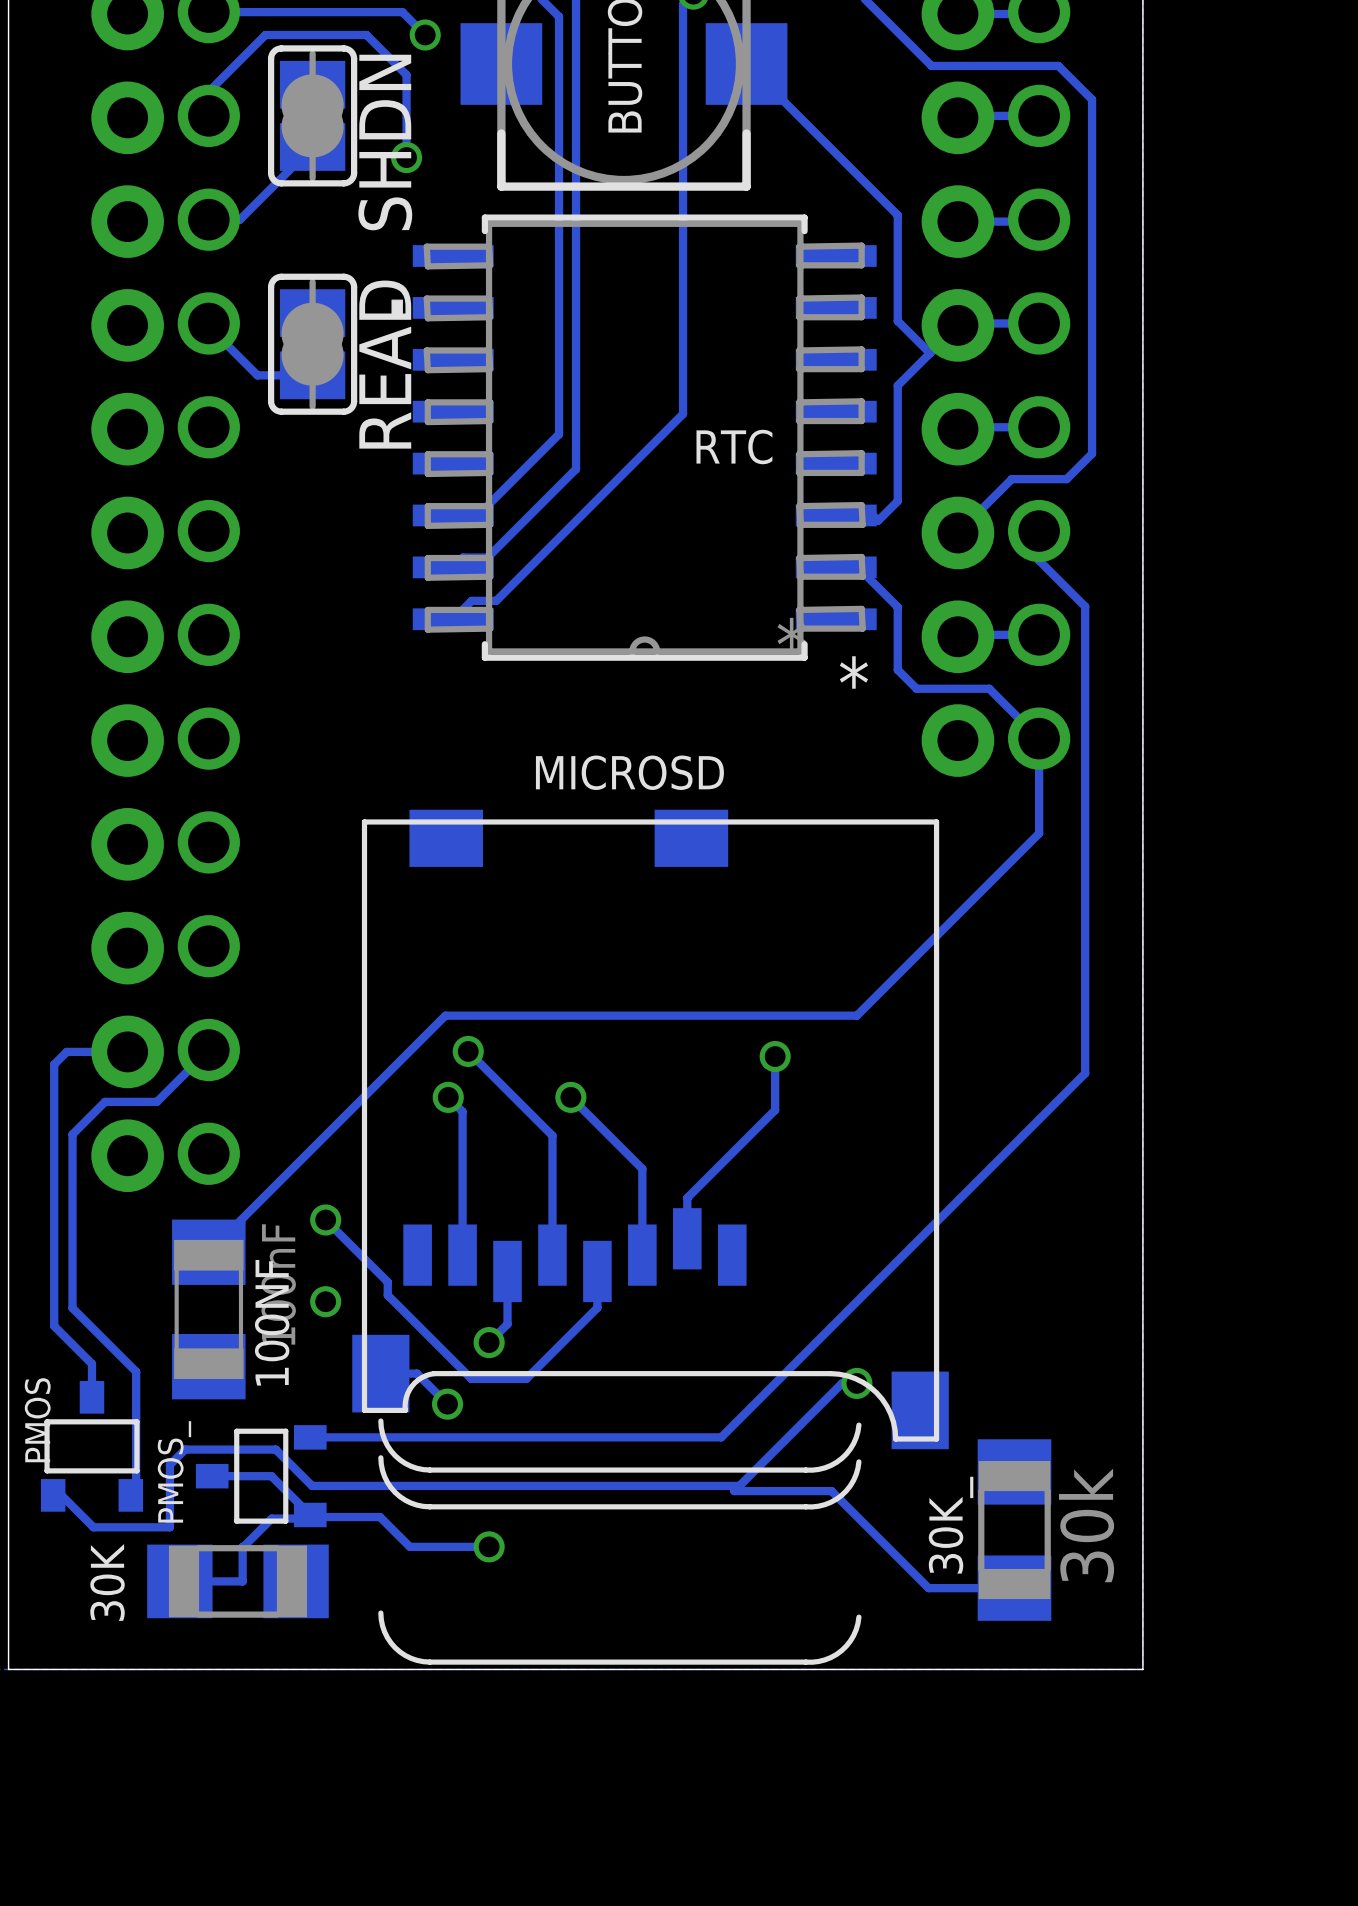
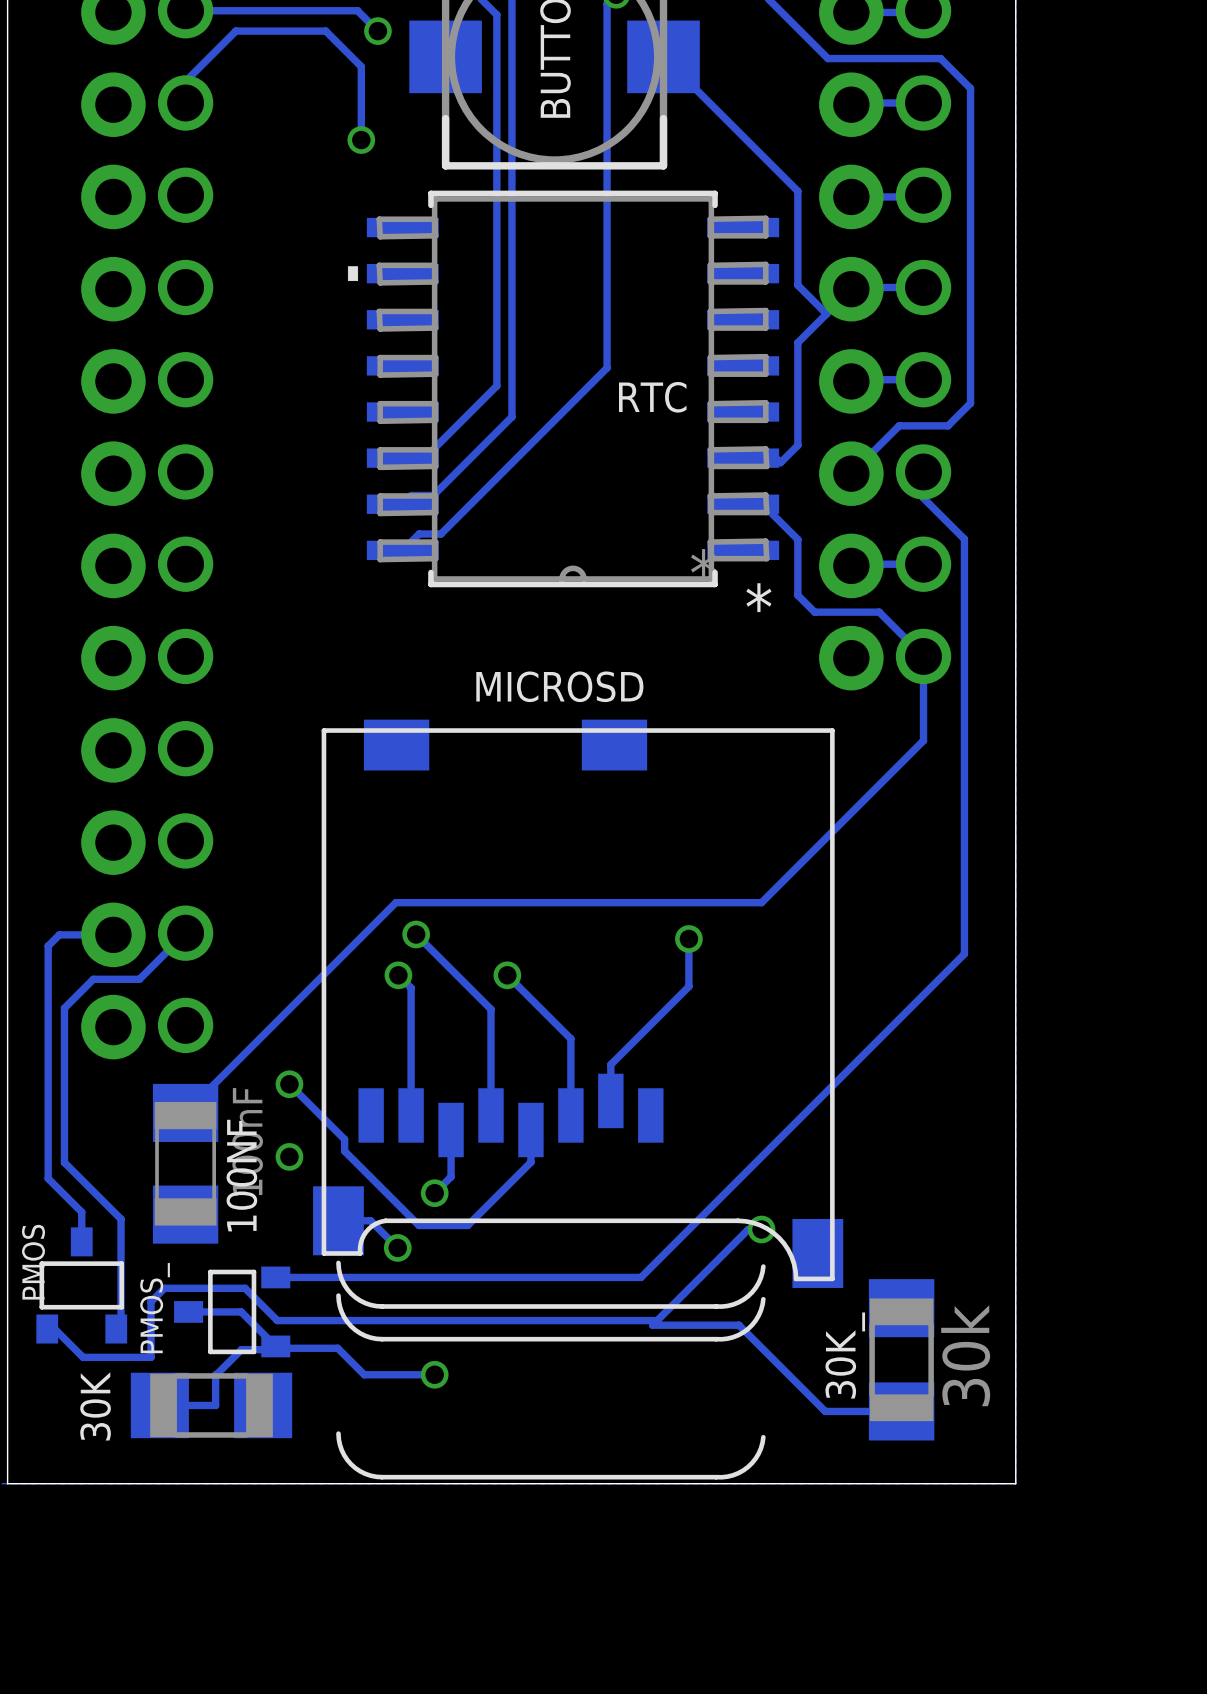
SHDN: (312, 115) -> none
track: (312, 147) (239, 219) (208, 219) -> none
track: (208, 323) (208, 326) (257, 375) (312, 375) -> none
READ: (312, 344) -> none

